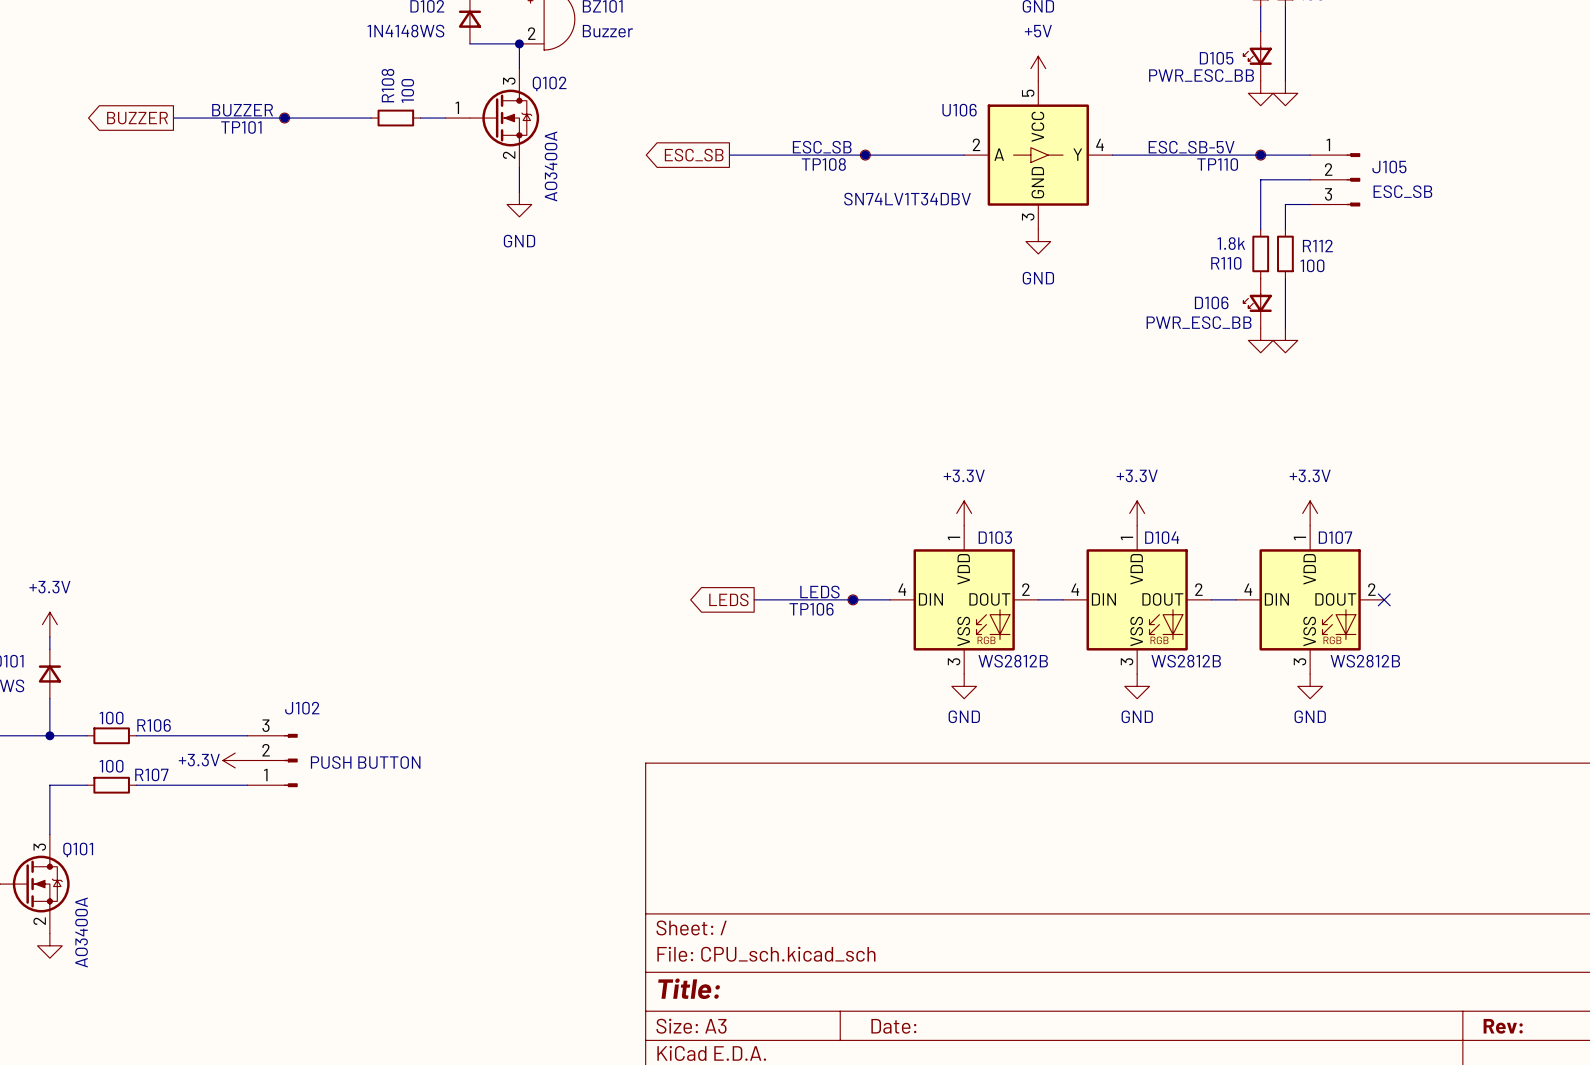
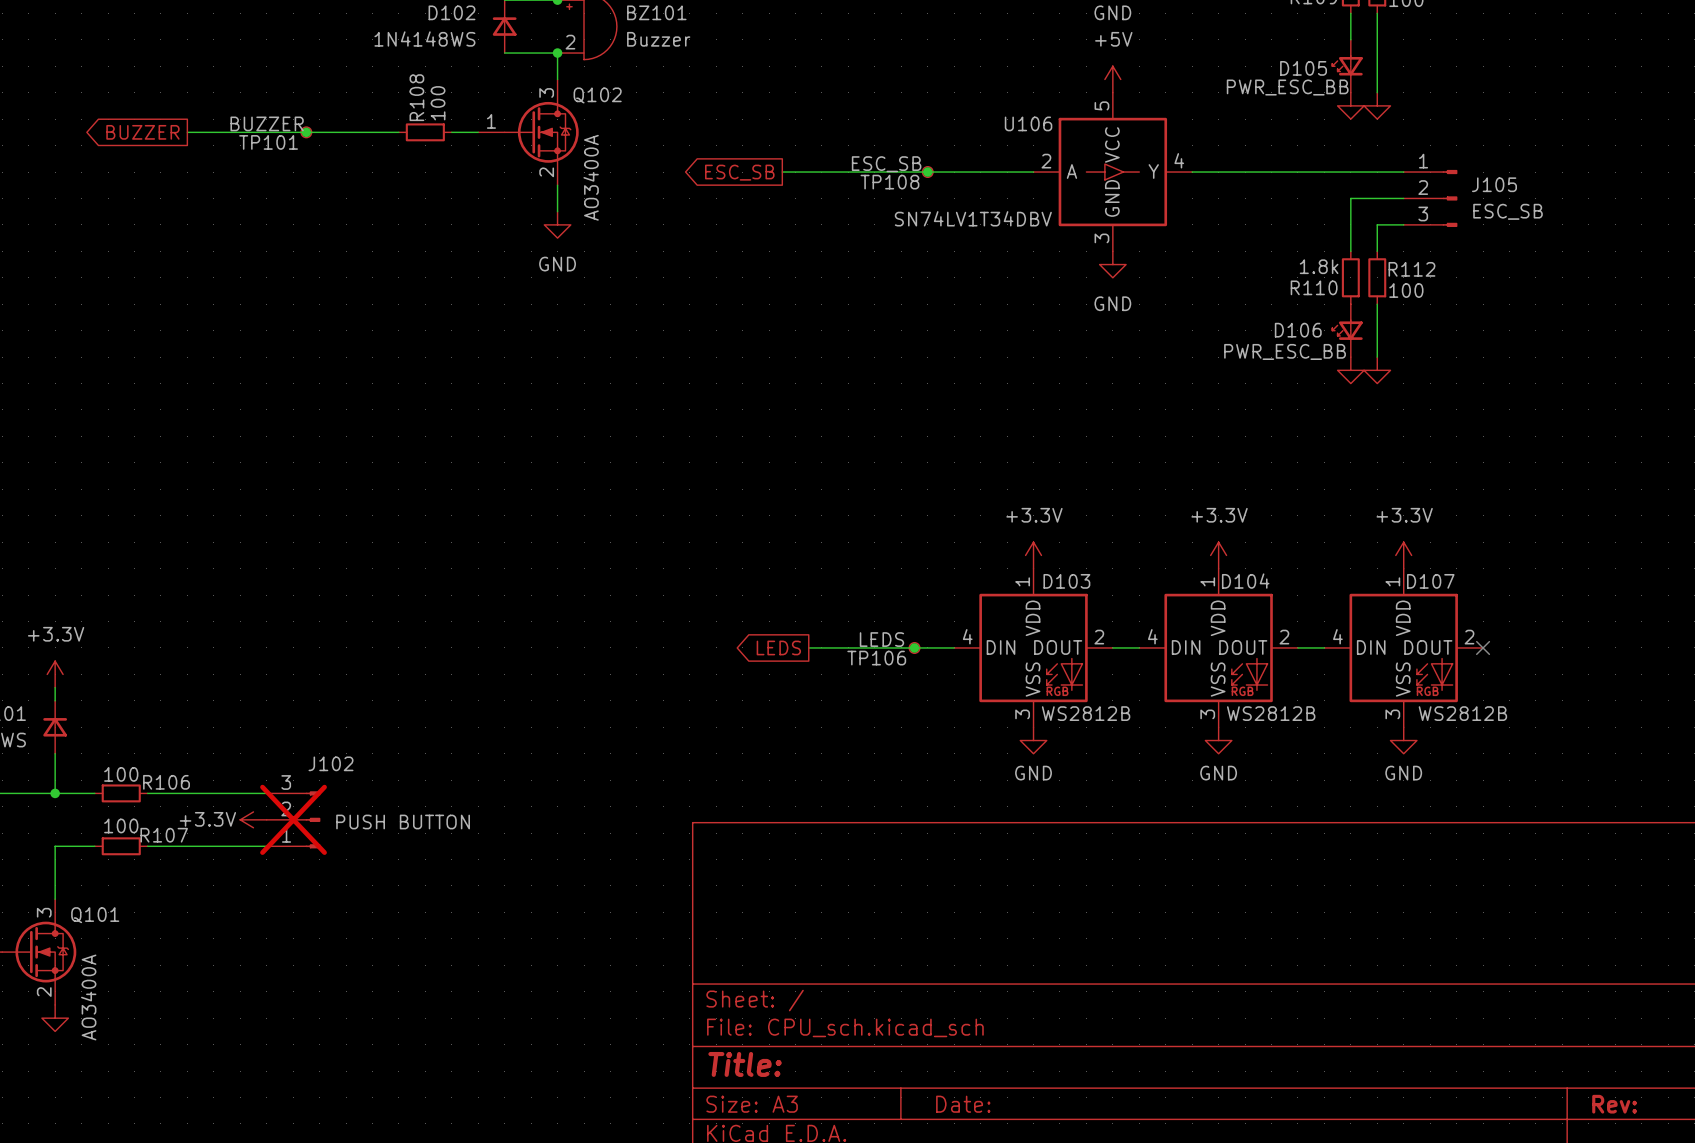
junction: (1260, 155) -> none
TP110: ESC_SB-5V (1260, 155) -> none
J102 do-not-place cross: none -> (293, 819)

